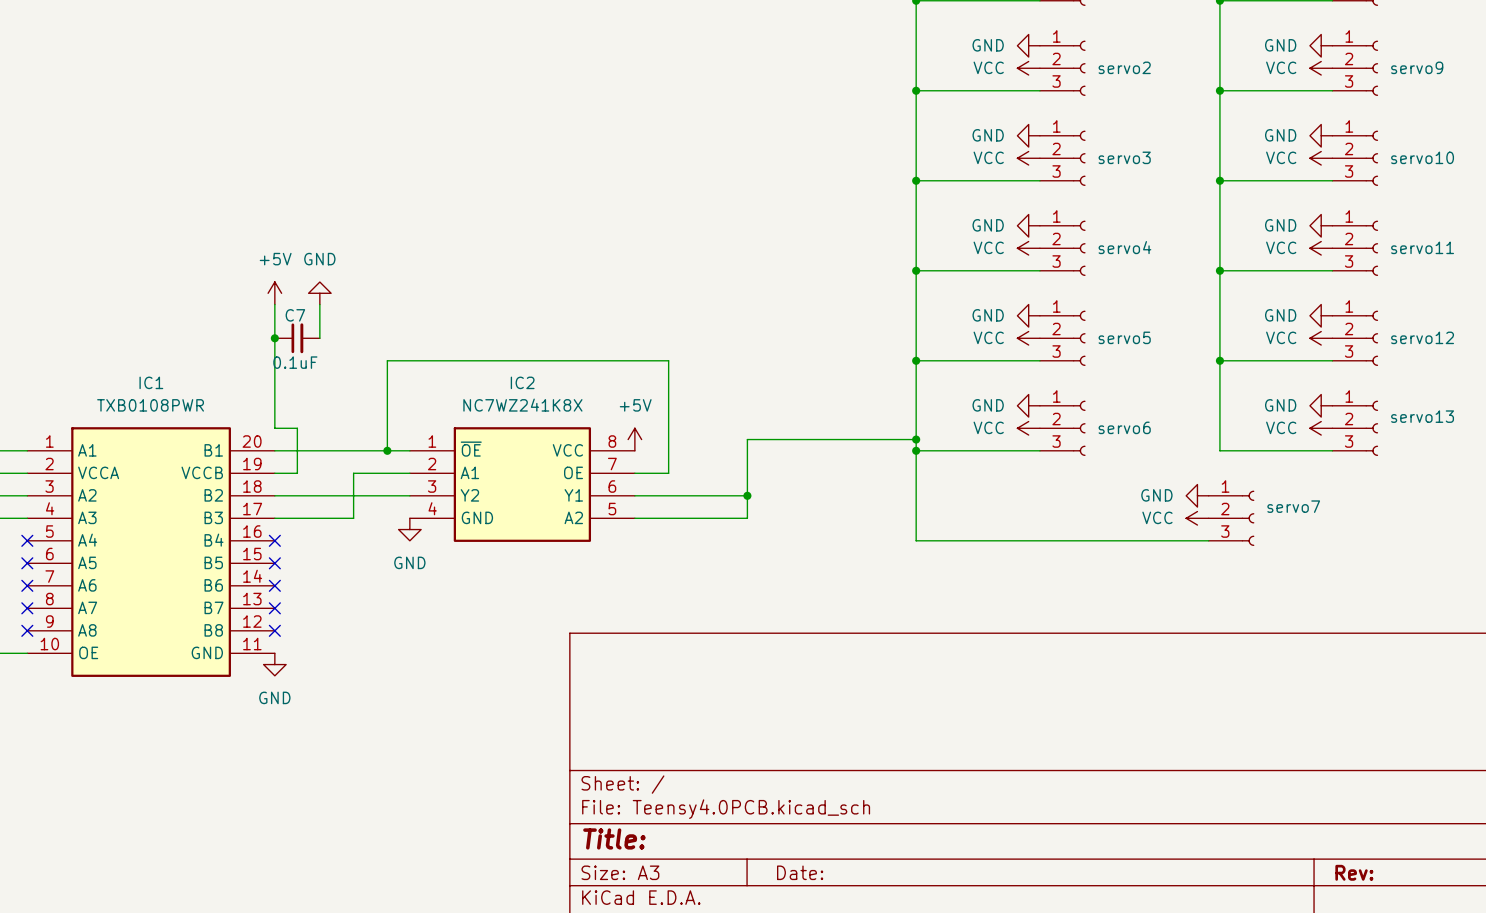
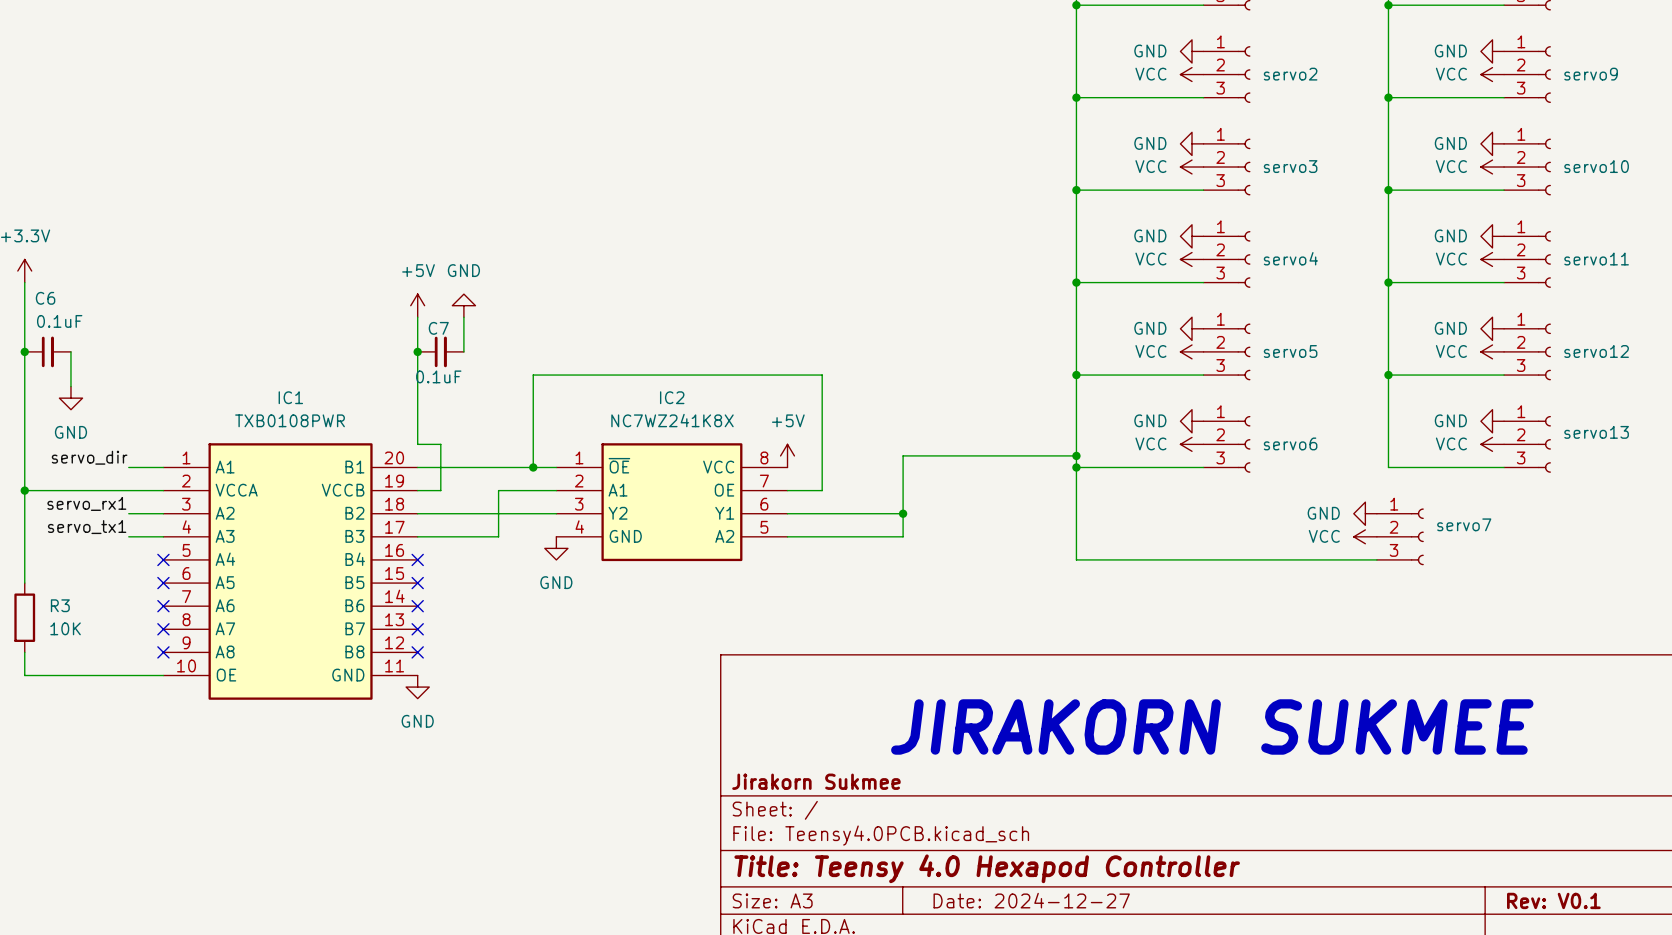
text: none -> JIRAKORN SUKMEE (1212, 726)
title block: none -> Jirakorn Sukmee (816, 781)
title block: Title: (614, 838) -> Title: Teensy 4.0 Hexapod Controller (987, 868)
title block: Date: (800, 872) -> Date: 2024-12-27 (1031, 900)
title block: Rev: (1354, 872) -> Rev: V0.1 (1553, 900)

